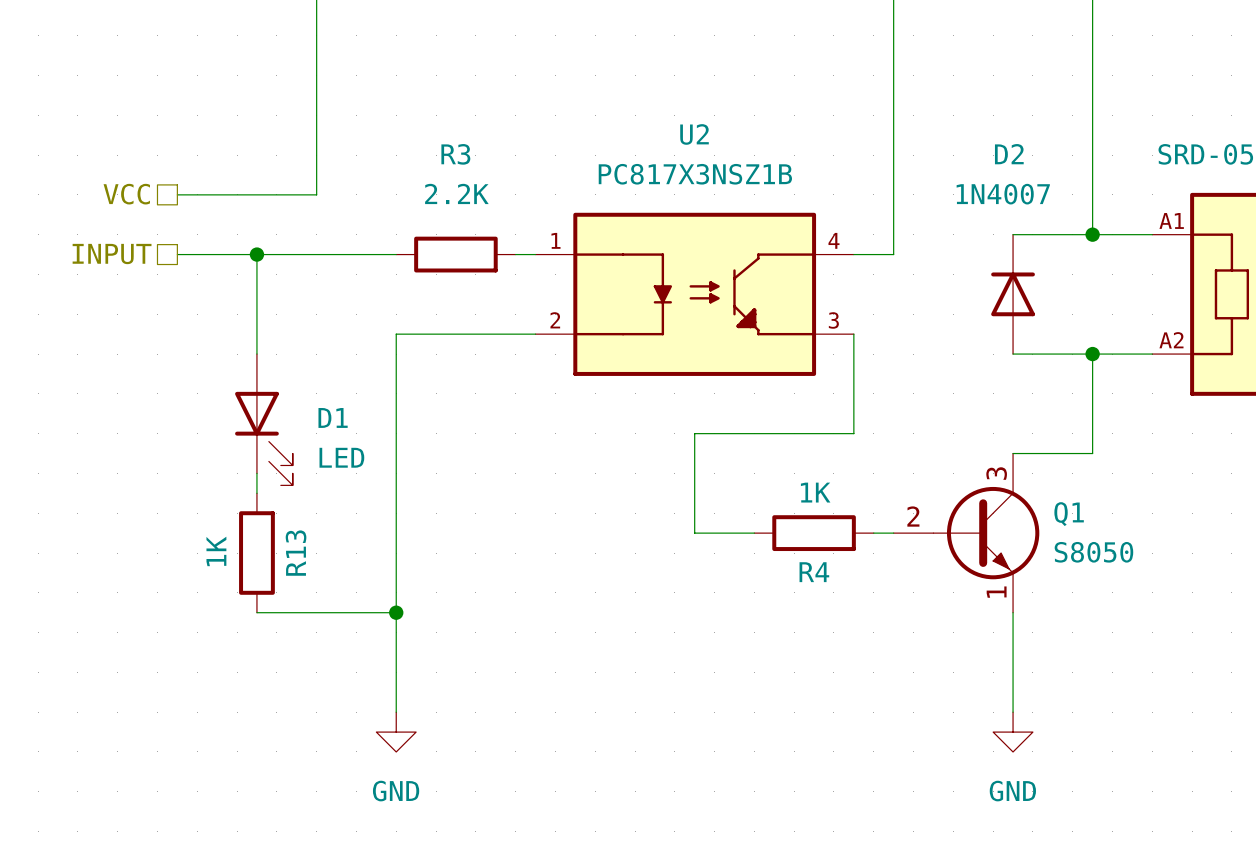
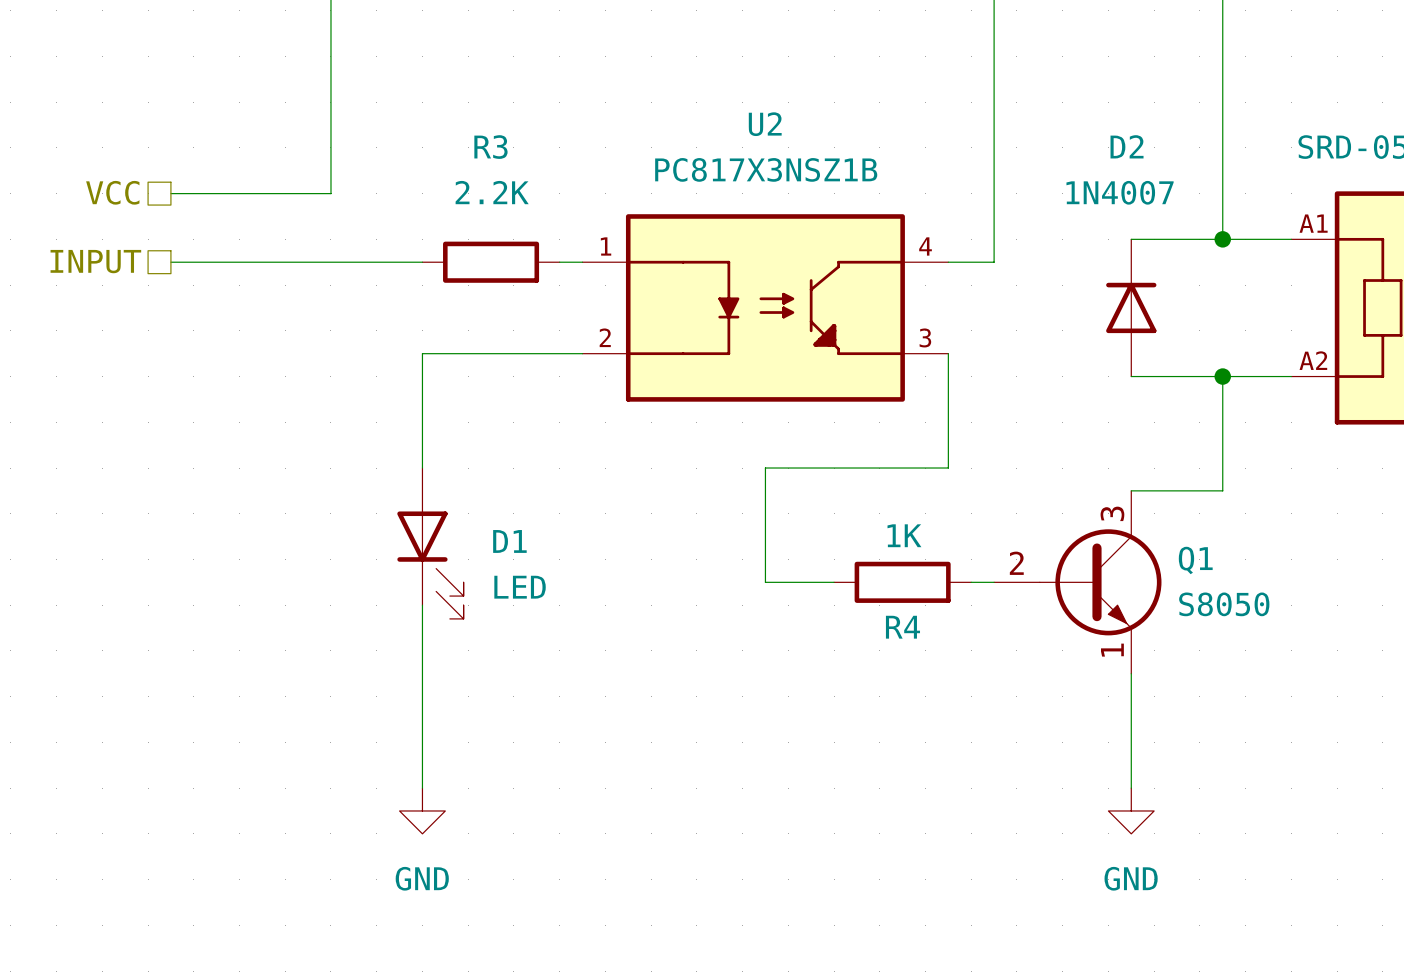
wire: (256, 254) (256, 354) -> none
junction: (256, 254) -> none
D1 position: (263, 419) -> (430, 543)
wire: (256, 473) (256, 493) -> none
R13: 1K (256, 553) -> none
wire: (256, 612) (396, 612) -> none
junction: (396, 612) -> none

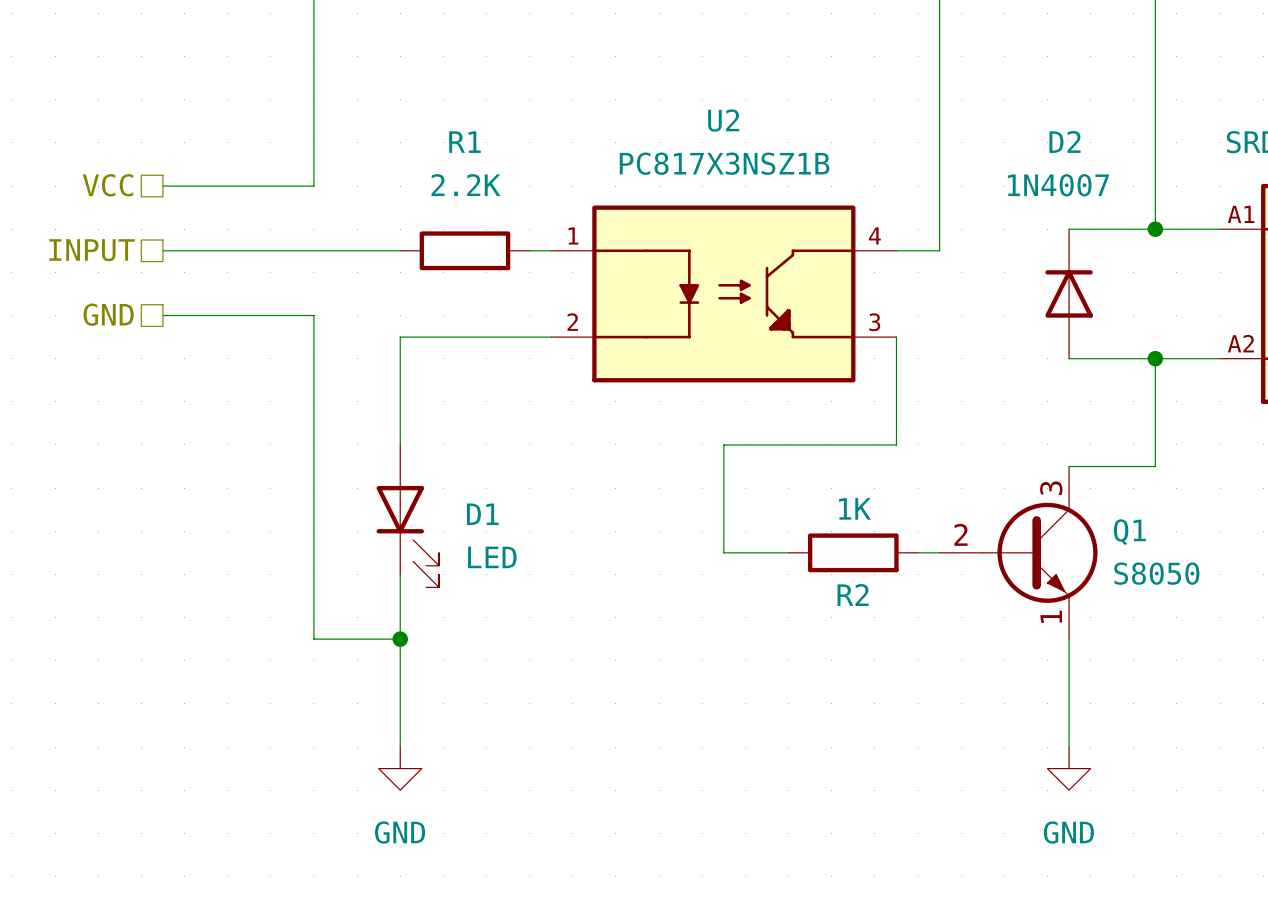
R3 name: R3 (490, 147) -> R1 (464, 142)
hierarchical label: none -> GND (108, 314)
wire: none -> (162, 315) (313, 315) (313, 639) (400, 639)
R4 name: R4 (902, 627) -> R2 (853, 594)
junction: none -> (400, 639)

